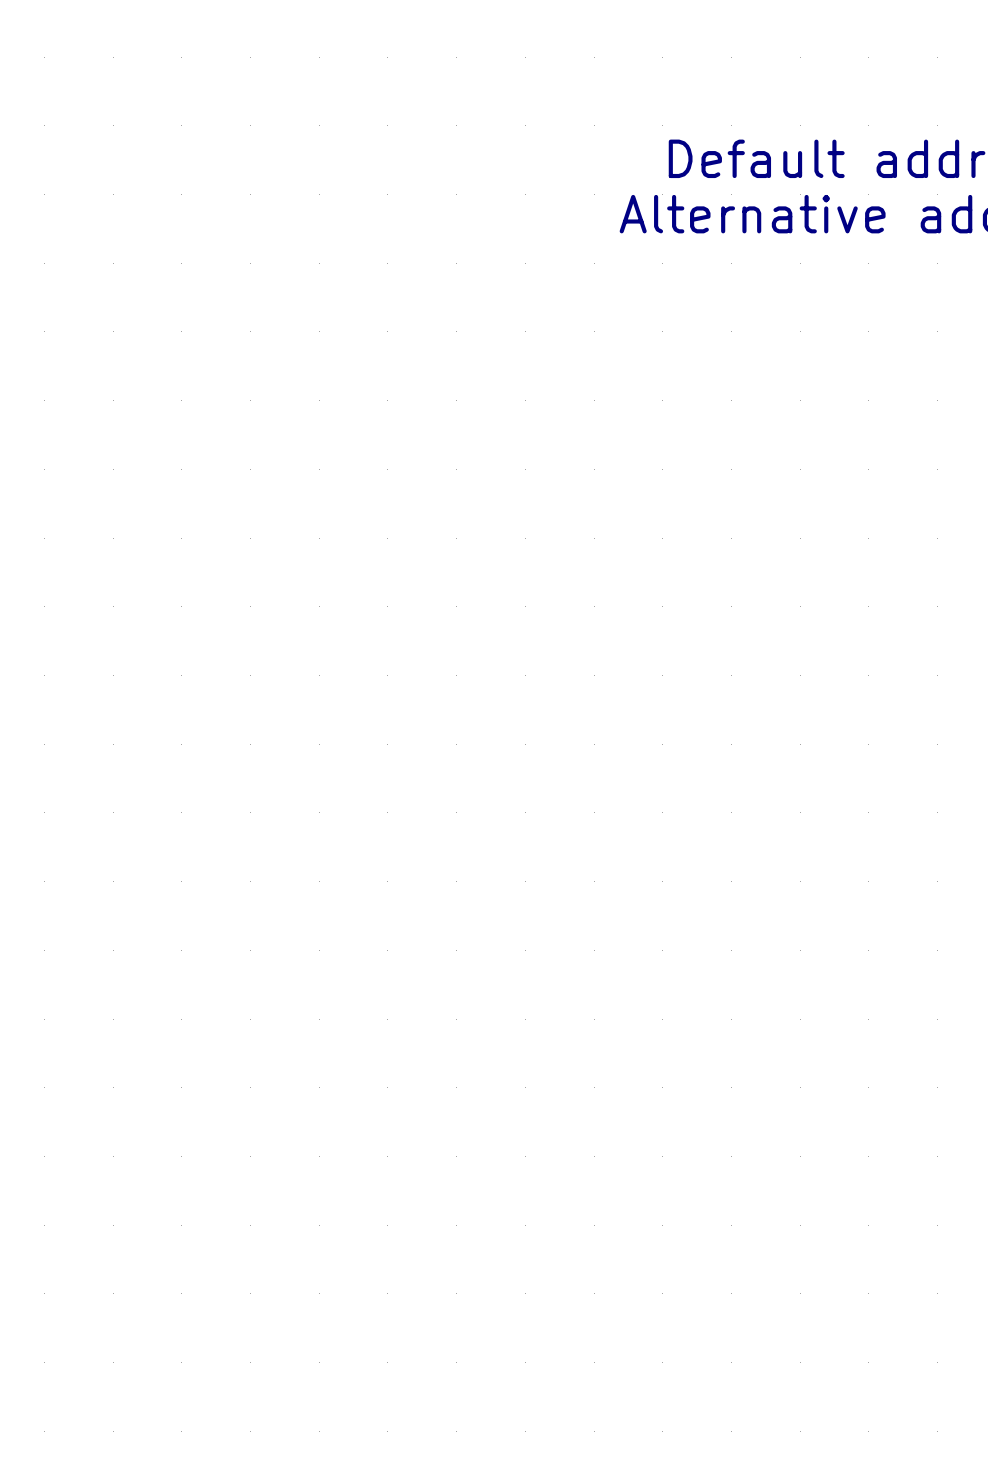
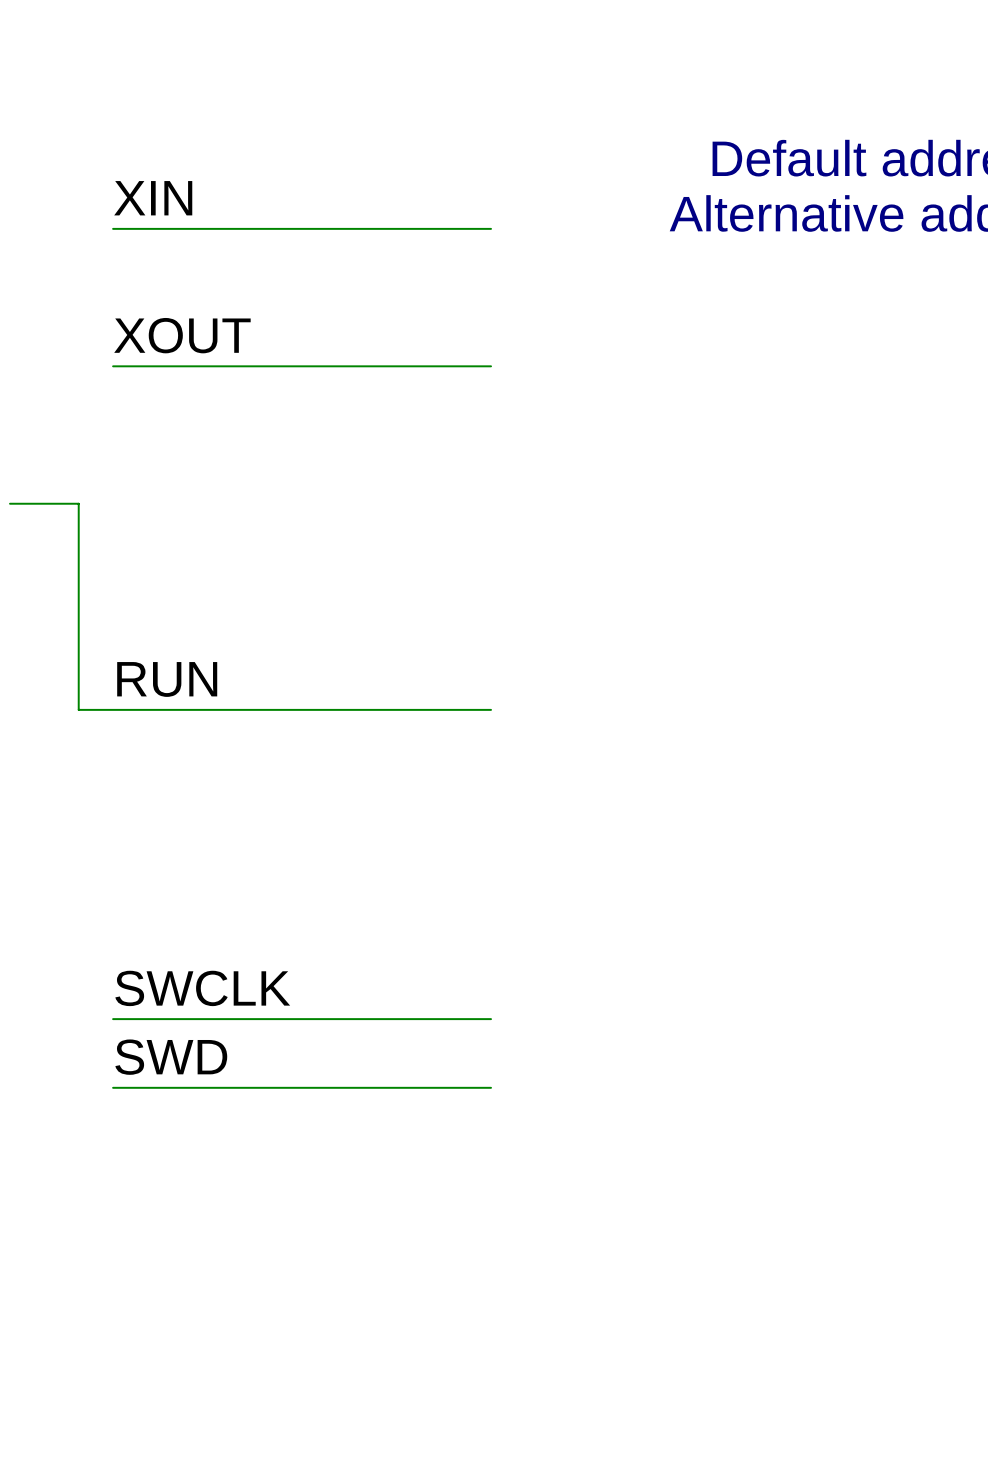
label: none -> XIN (153, 198)
wire: none -> (113, 228) (491, 228)
label: none -> XOUT (182, 335)
wire: none -> (113, 366) (491, 366)
wire: none -> (10, 503) (78, 503) (78, 709) (491, 709)
label: none -> RUN (167, 679)
label: none -> SWCLK (202, 988)
wire: none -> (113, 1019) (491, 1019)
label: none -> SWD (171, 1057)
wire: none -> (113, 1087) (491, 1087)

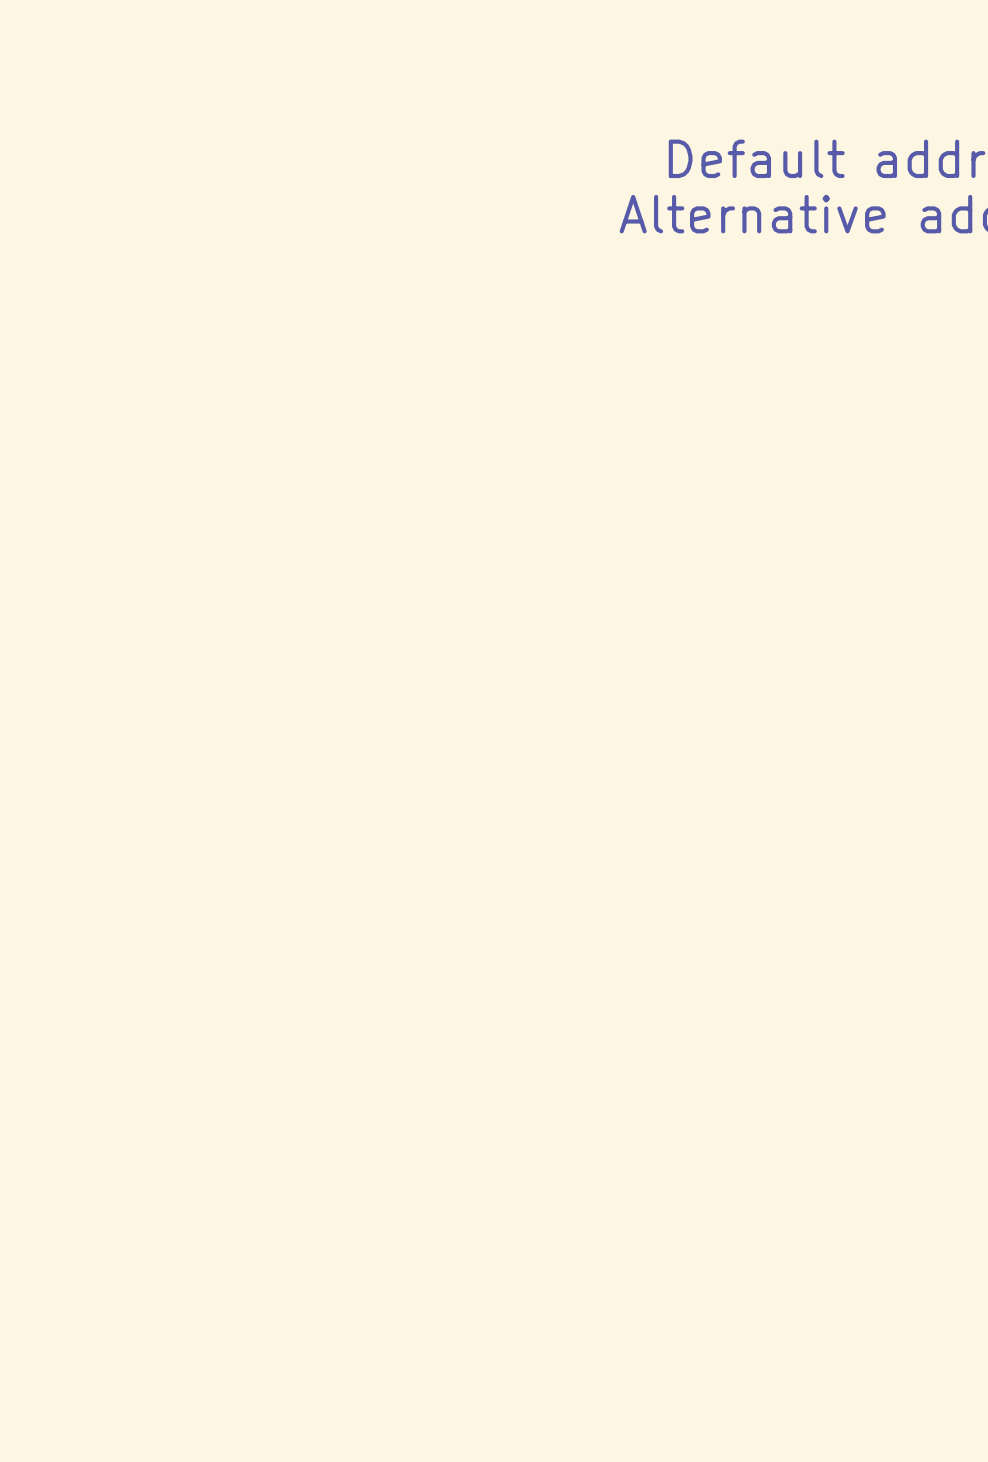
label: XIN (153, 198) -> none
wire: (113, 228) (491, 228) -> none
label: XOUT (182, 335) -> none
wire: (113, 366) (491, 366) -> none
wire: (10, 503) (78, 503) (78, 709) (491, 709) -> none
label: RUN (167, 679) -> none
label: SWCLK (202, 988) -> none
wire: (113, 1019) (491, 1019) -> none
label: SWD (171, 1057) -> none
wire: (113, 1087) (491, 1087) -> none

